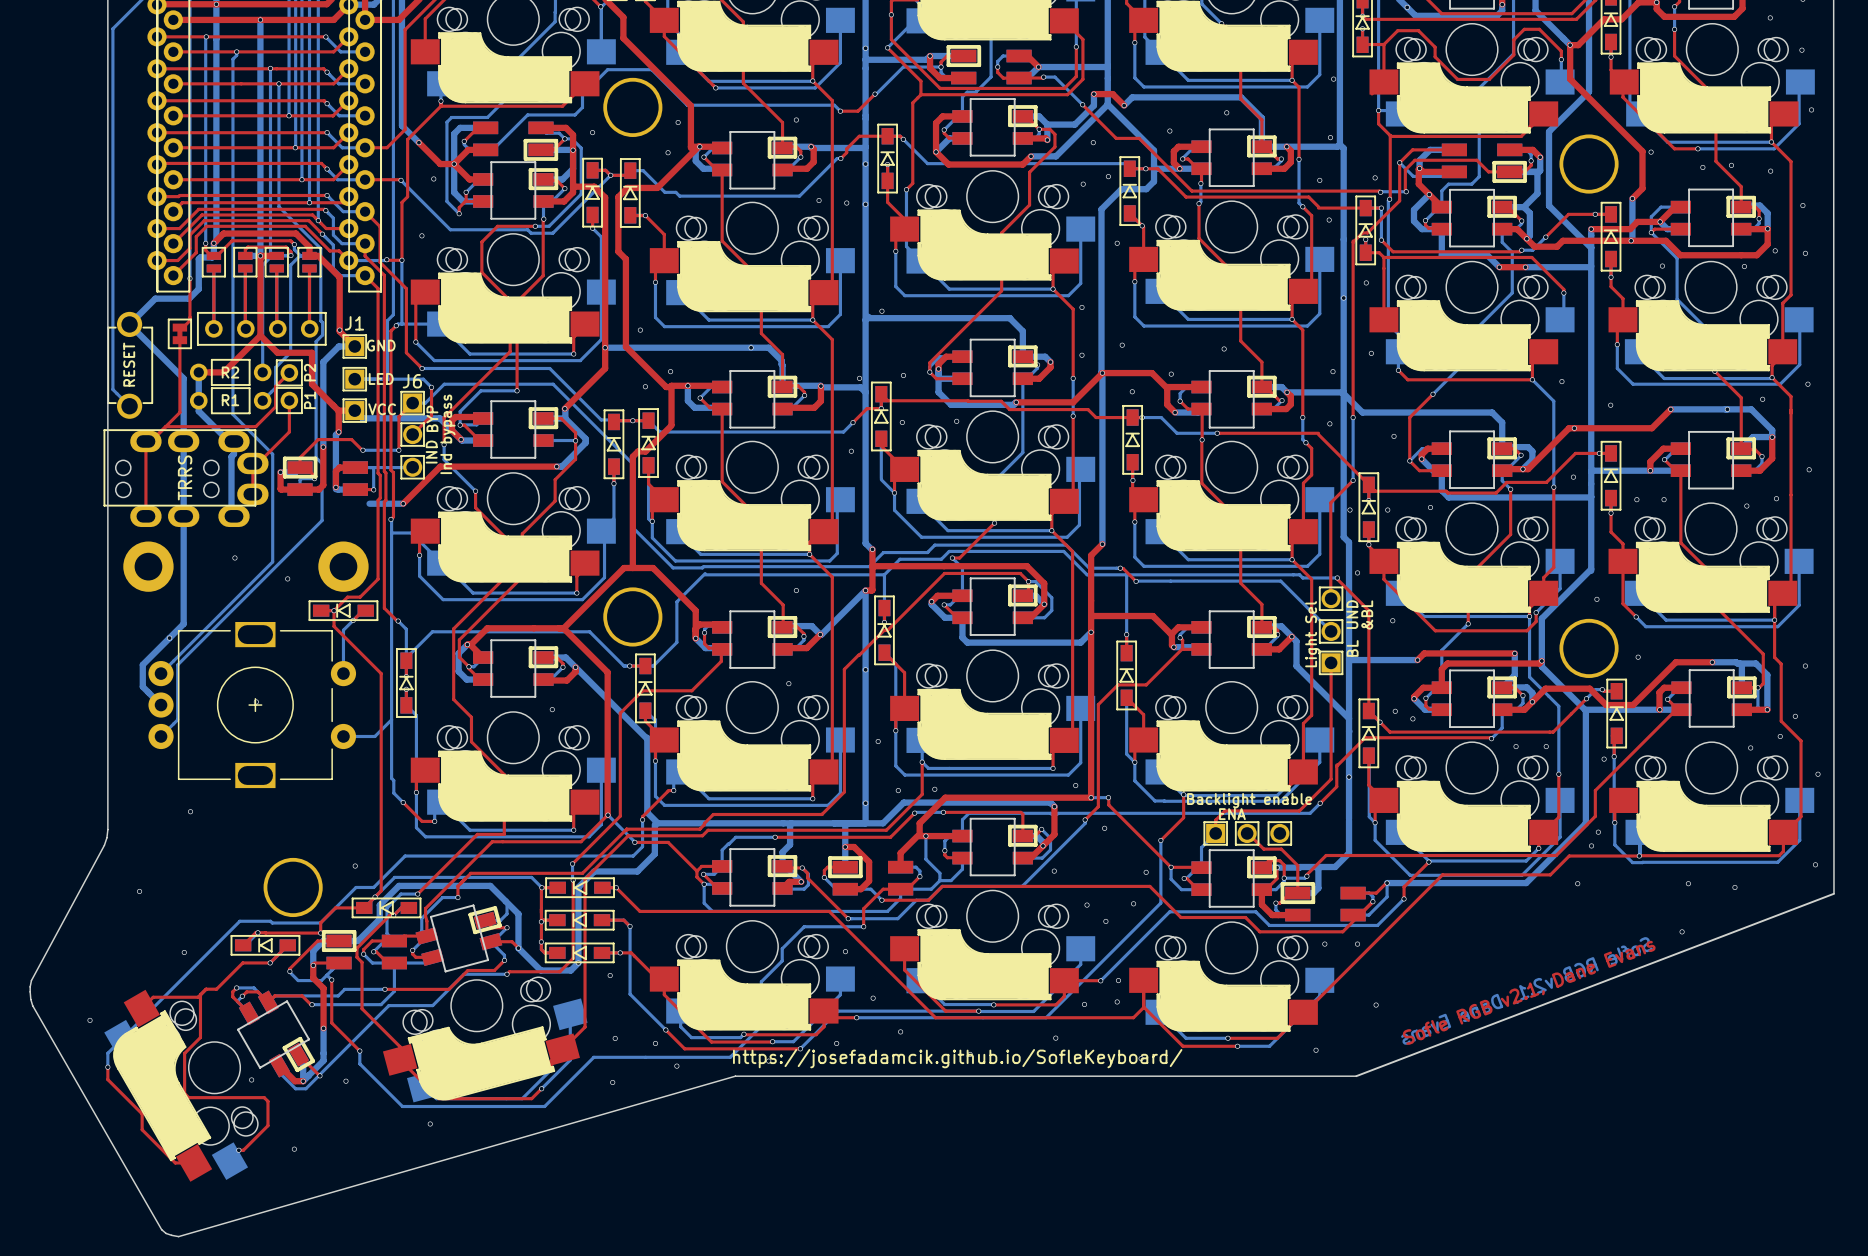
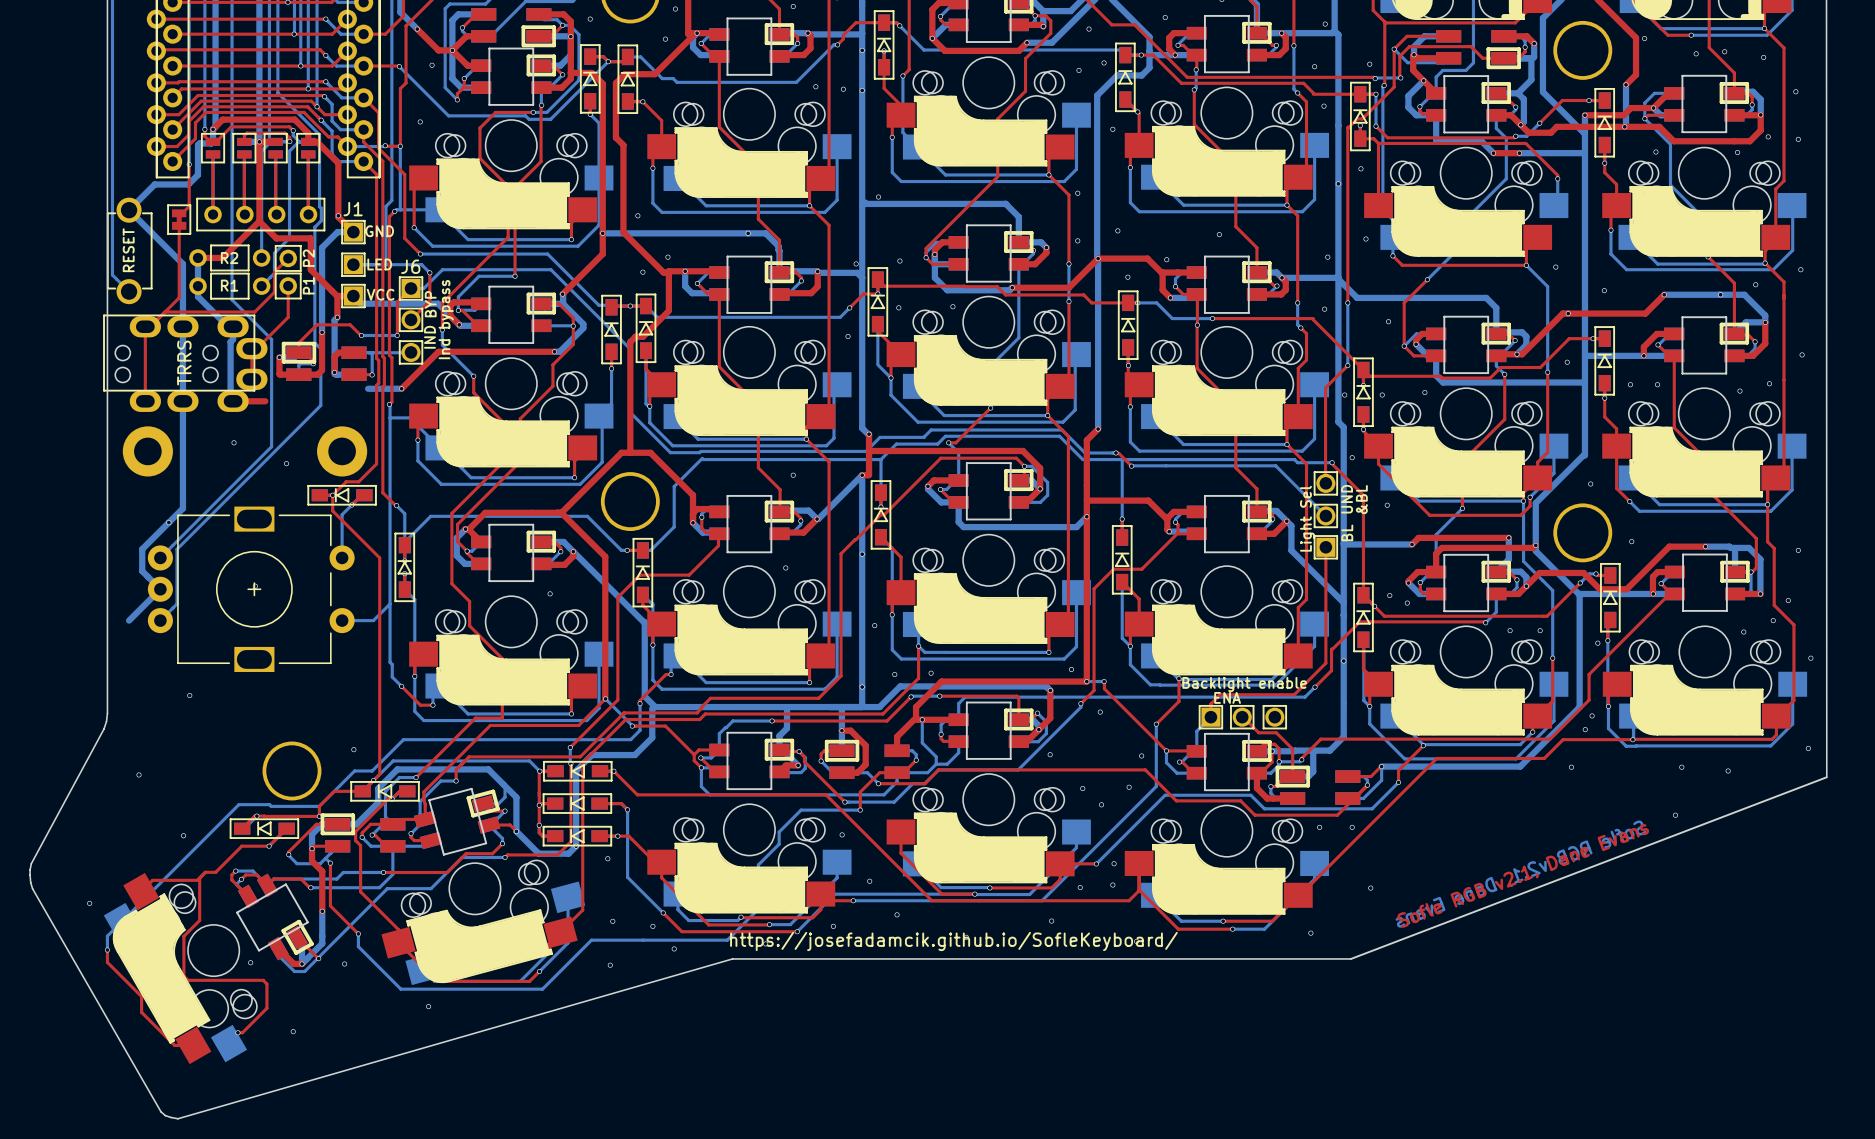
top track: none -> (233, 401) (265, 401)
bottom track: none -> (160, 589) (129, 620)

